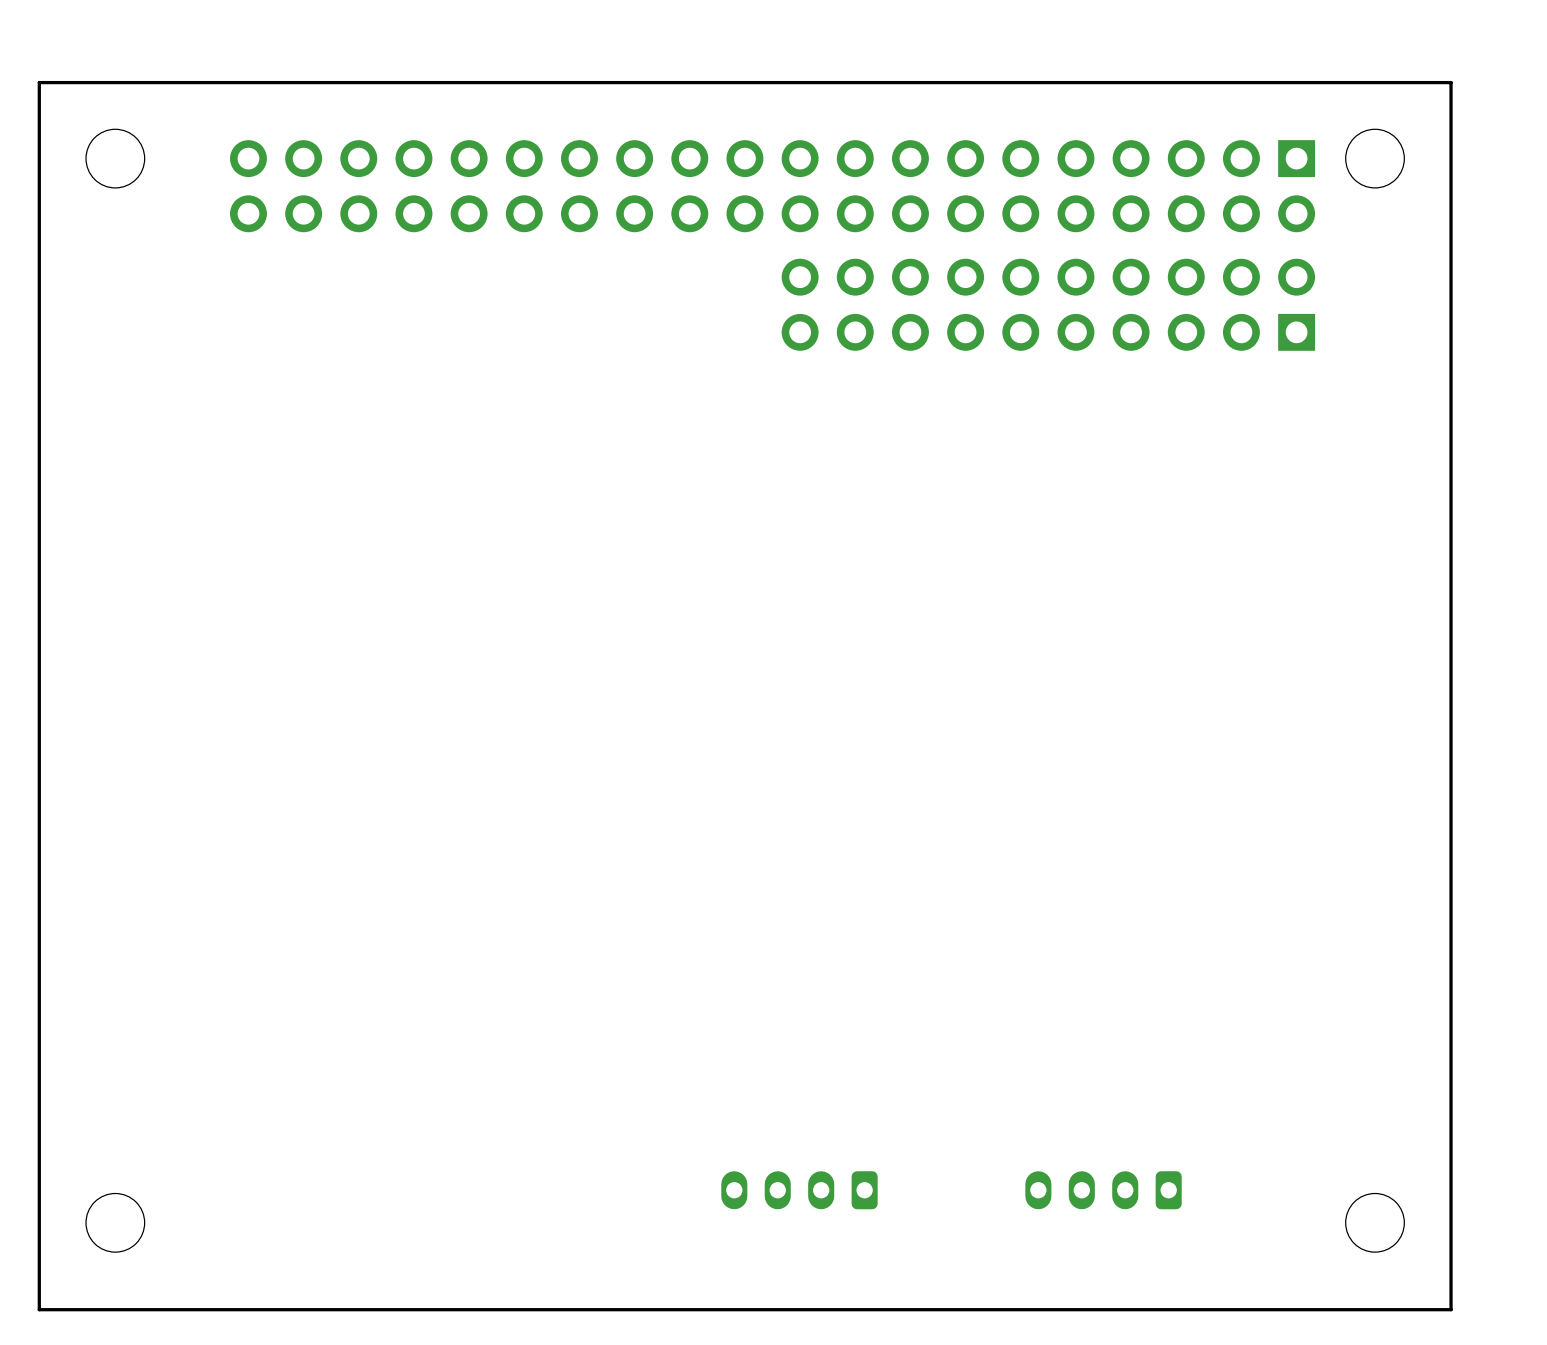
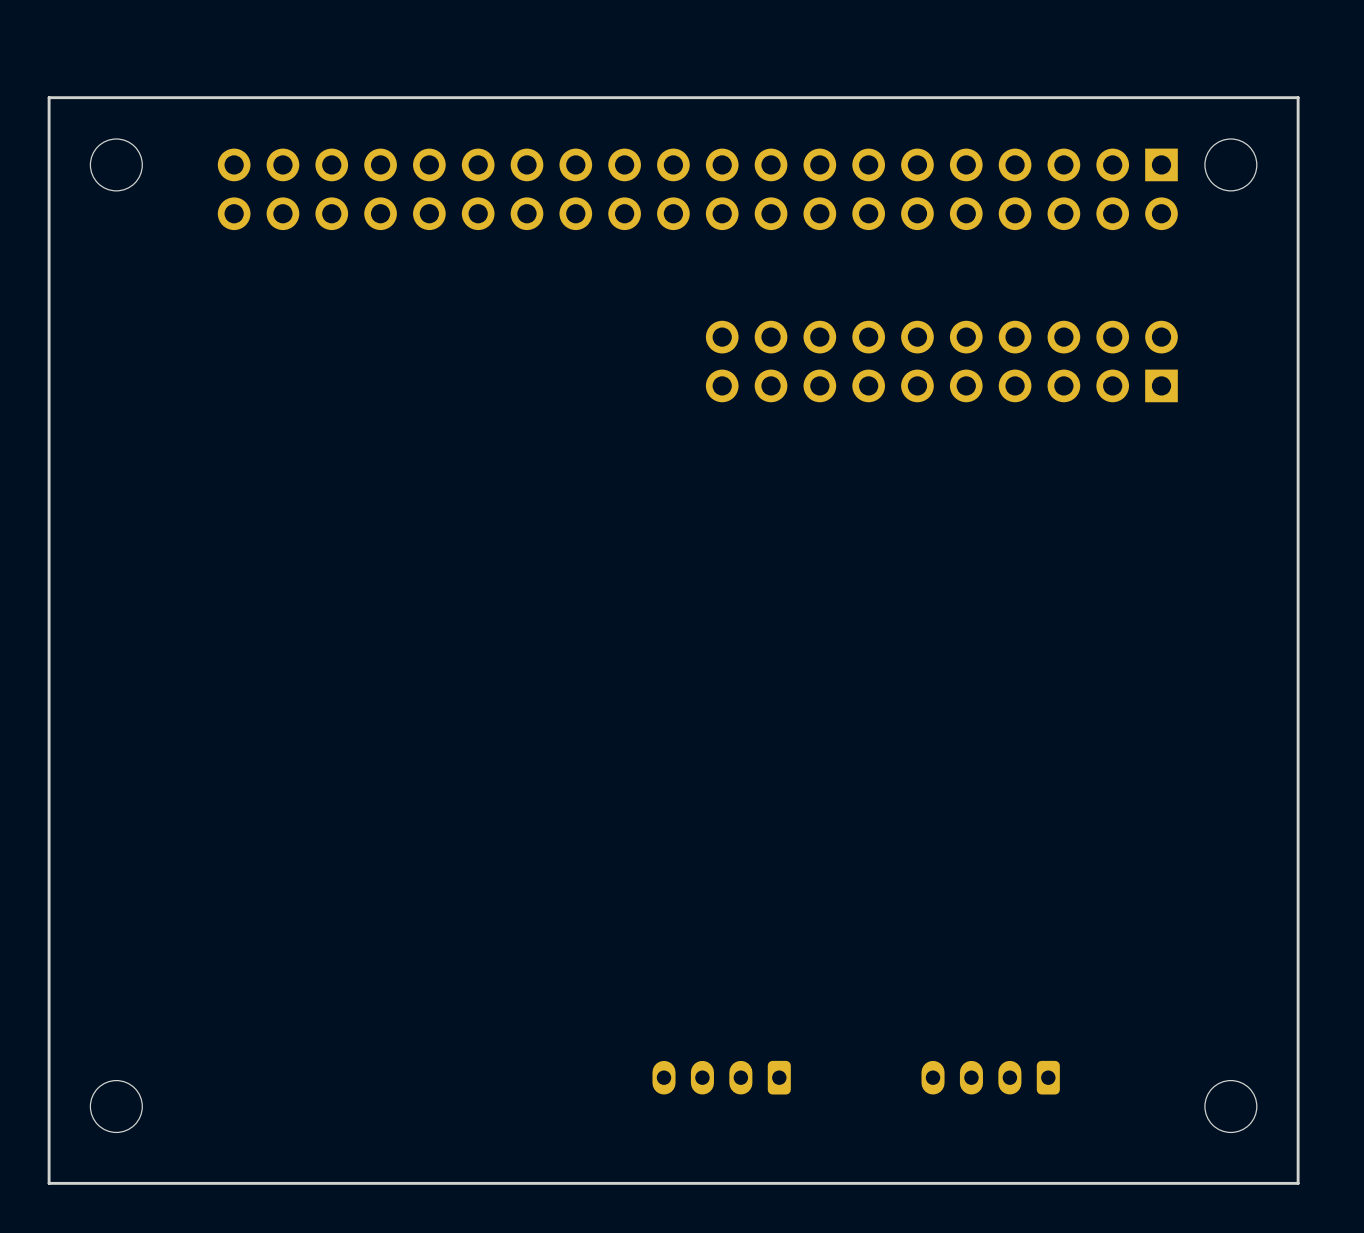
part position: (1048, 304) -> (941, 361)

